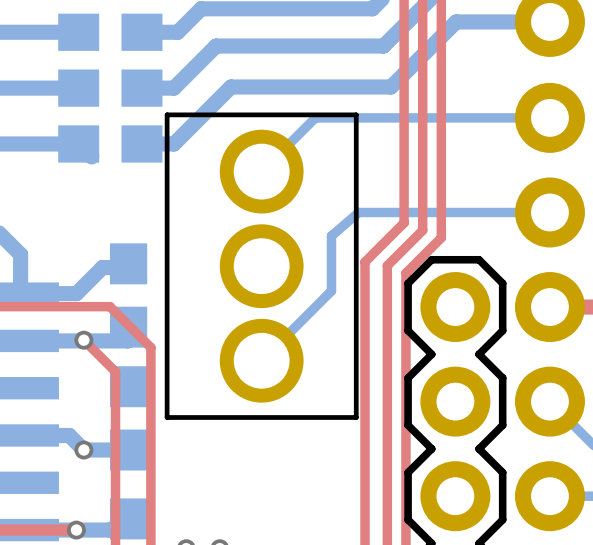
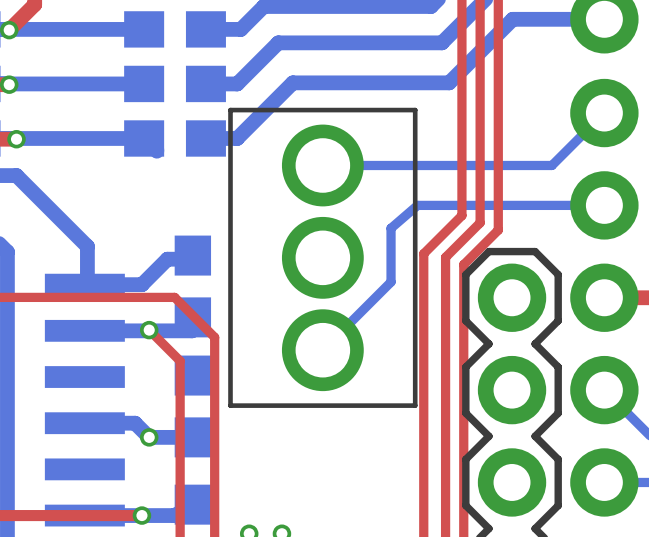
bottom track: (549, 117) (315, 117) (261, 171) -> (604, 113) (551, 165) (322, 165)

